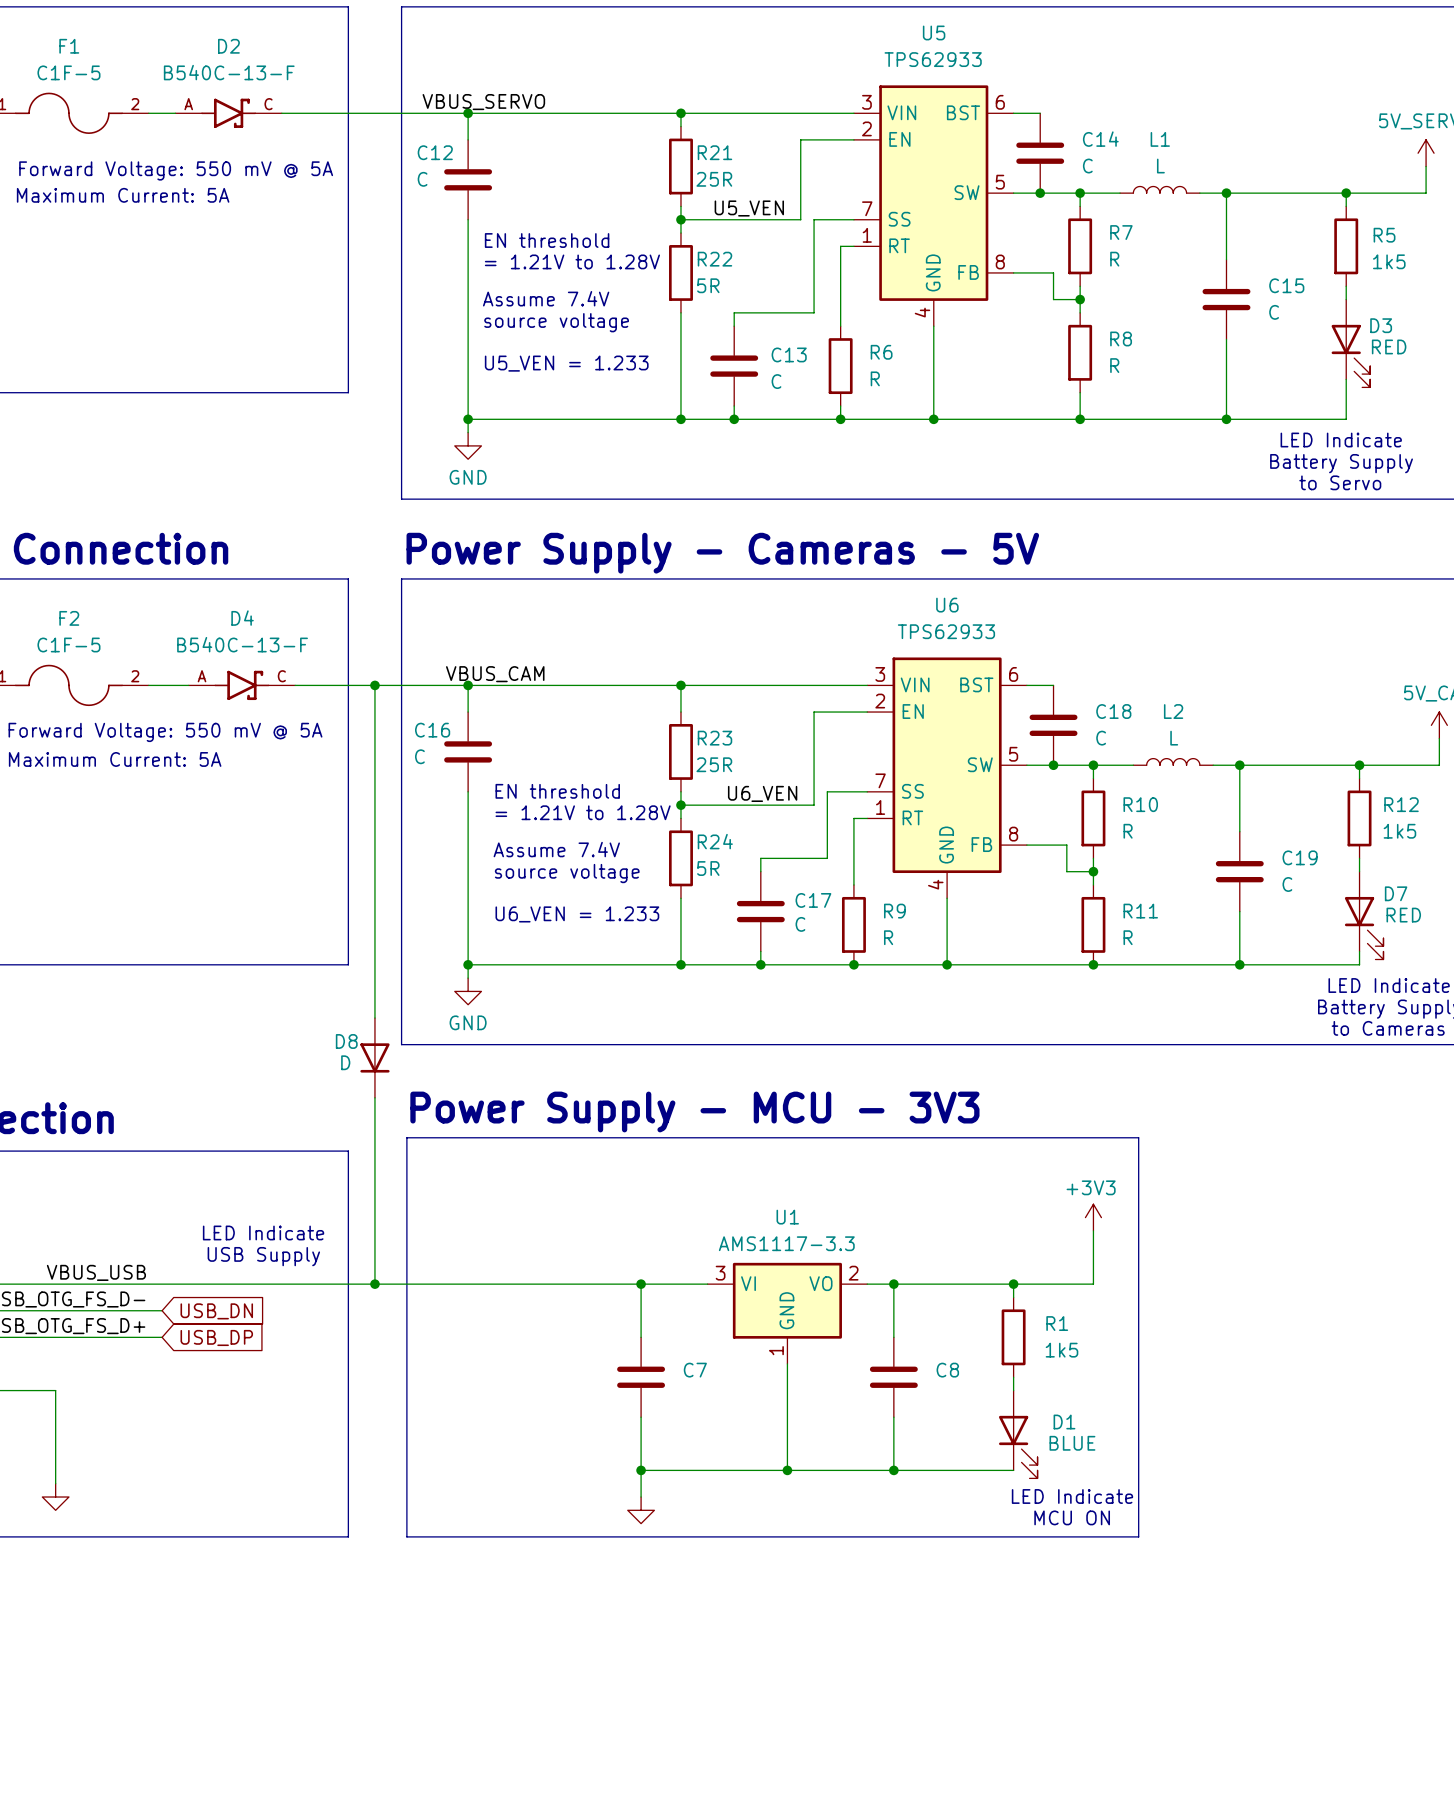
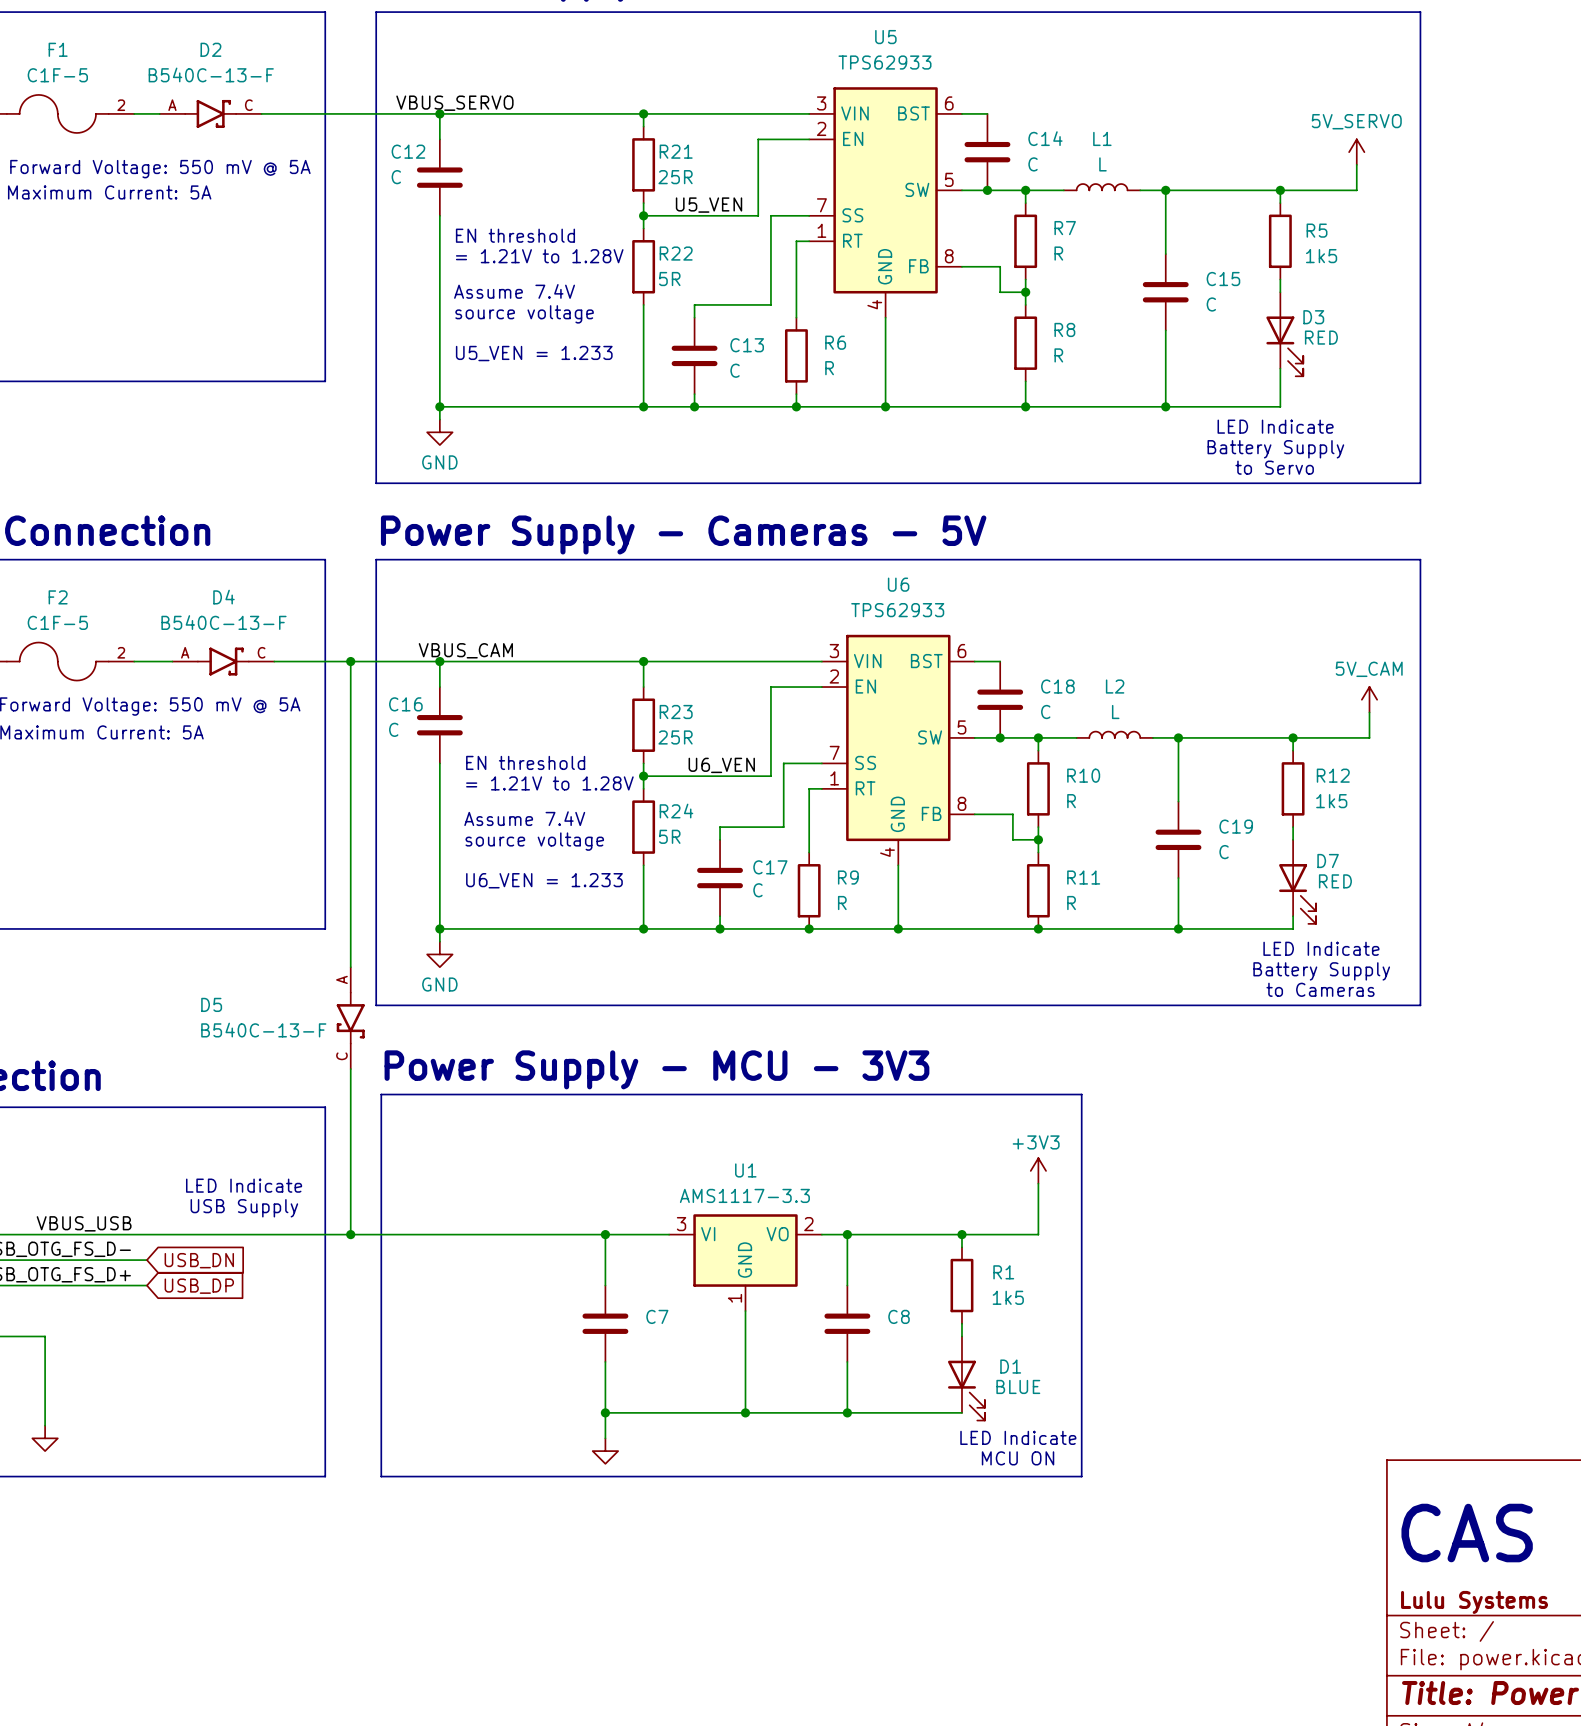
D8: D (374, 1057) -> none
D5: none -> B540C-13-F (350, 1018)

